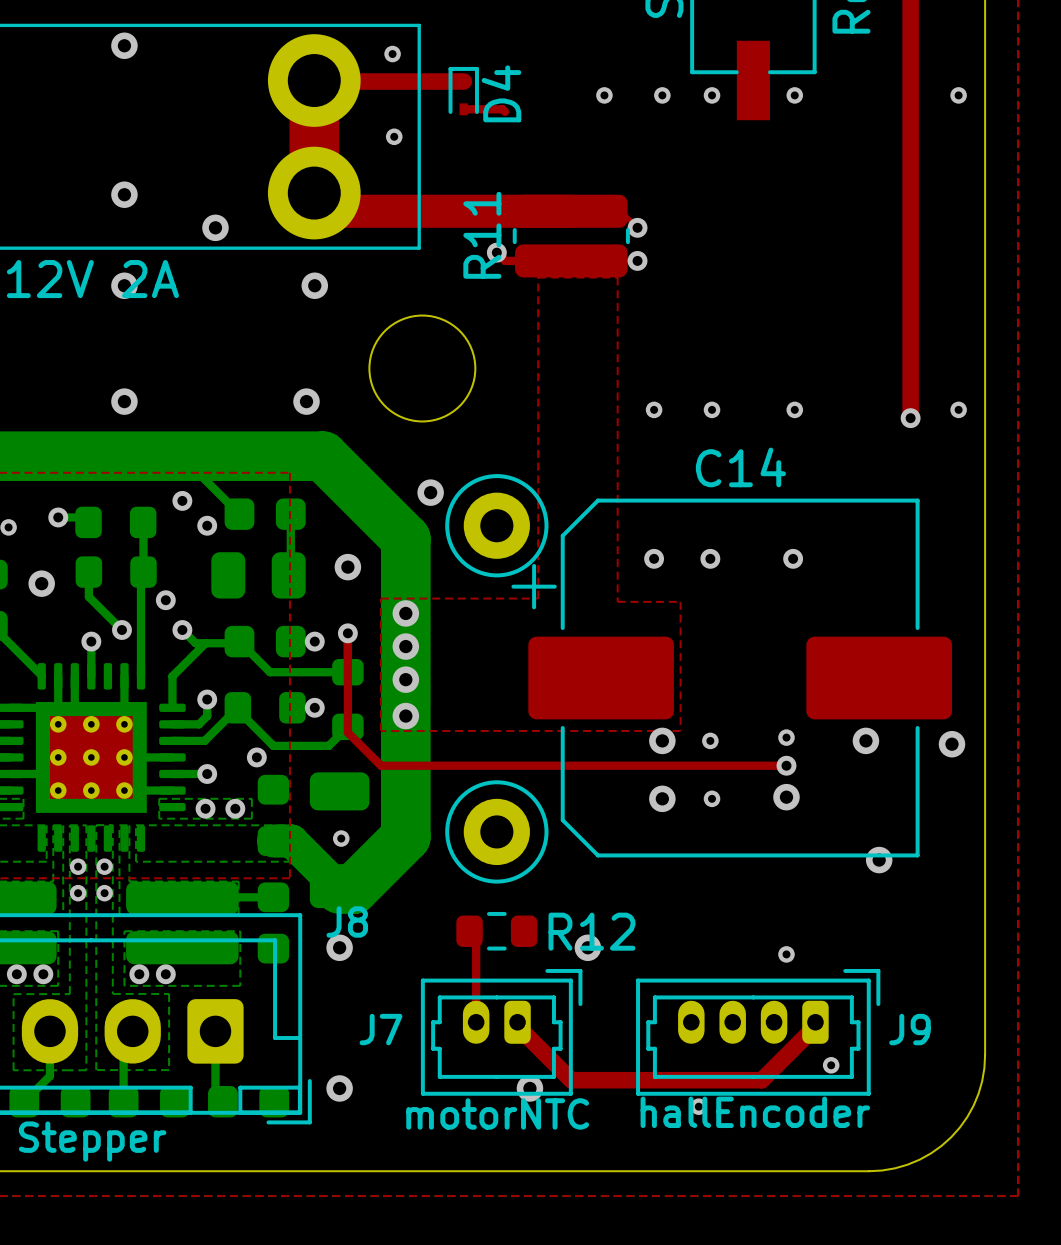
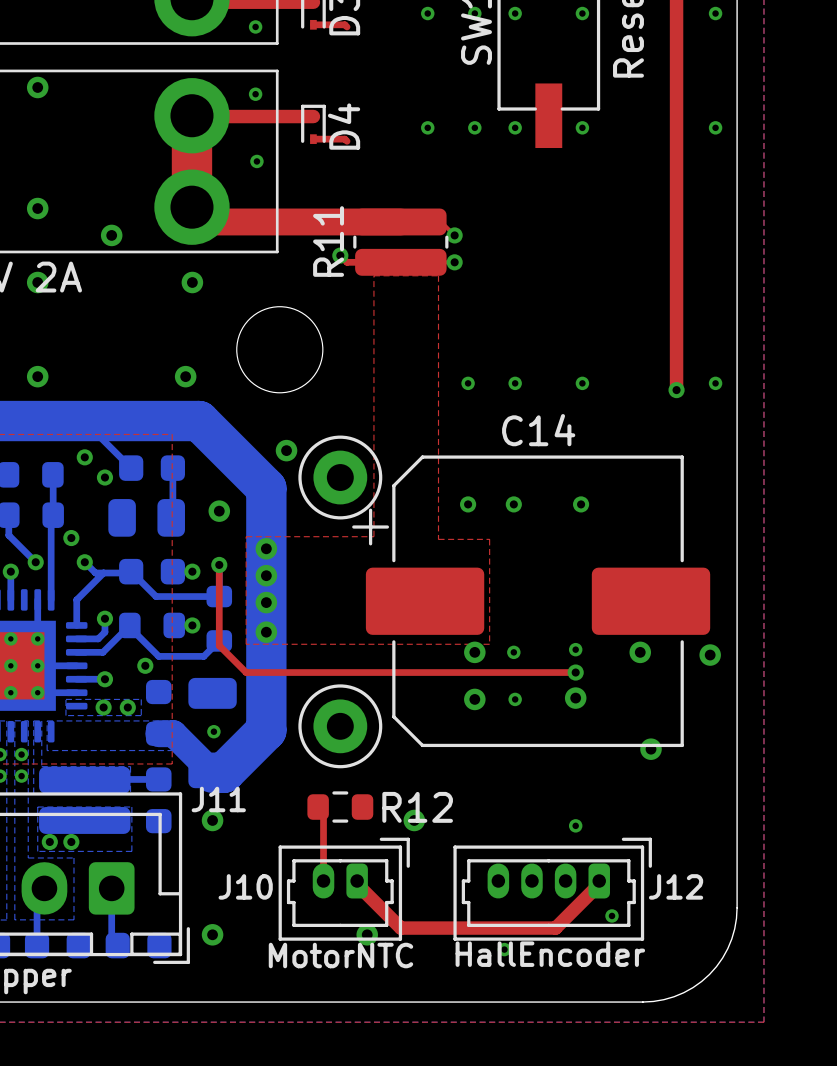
J8 name: J8 (347, 921) -> J11 (218, 799)
J7 name: J7 (380, 1029) -> J10 (245, 886)
J9 name: J9 (909, 1029) -> J12 (676, 886)
J9 value: hallEncoder (755, 1112) -> HallEncoder (550, 954)
J7 value: motorNTC (497, 1113) -> MotorNTC (340, 955)

